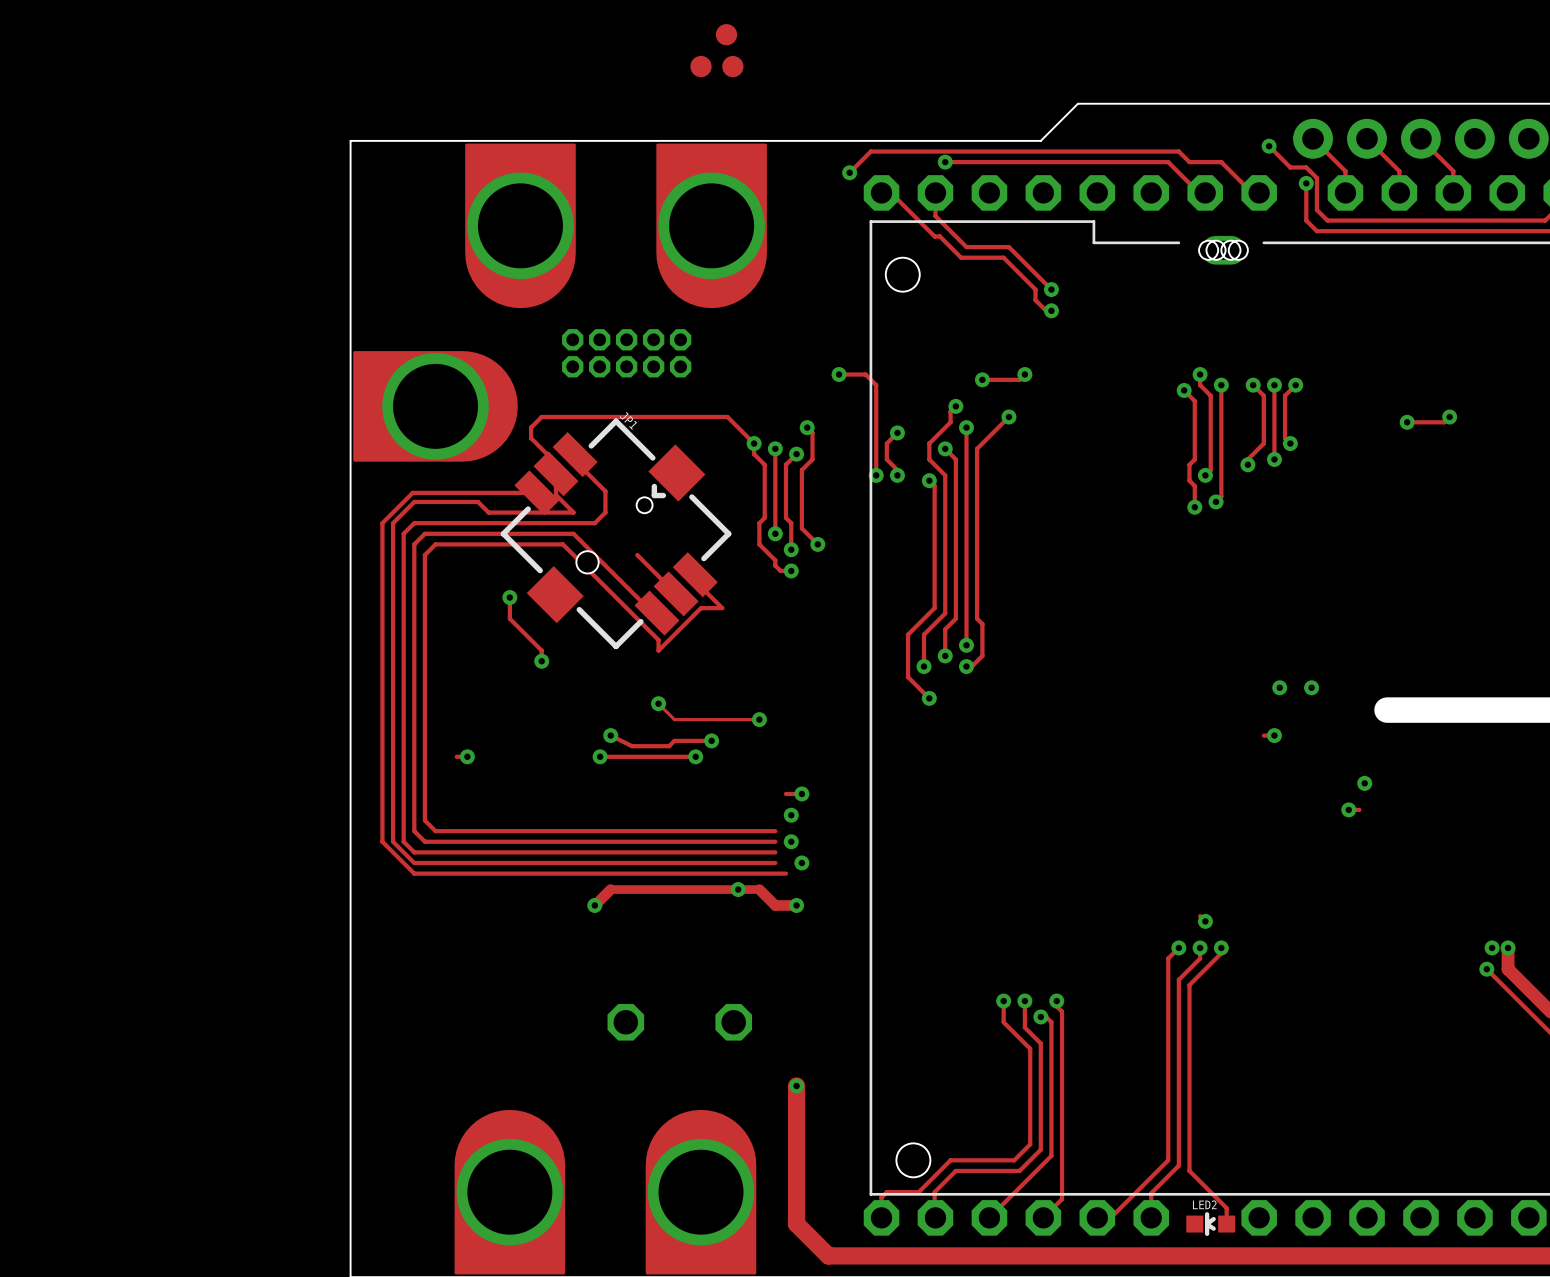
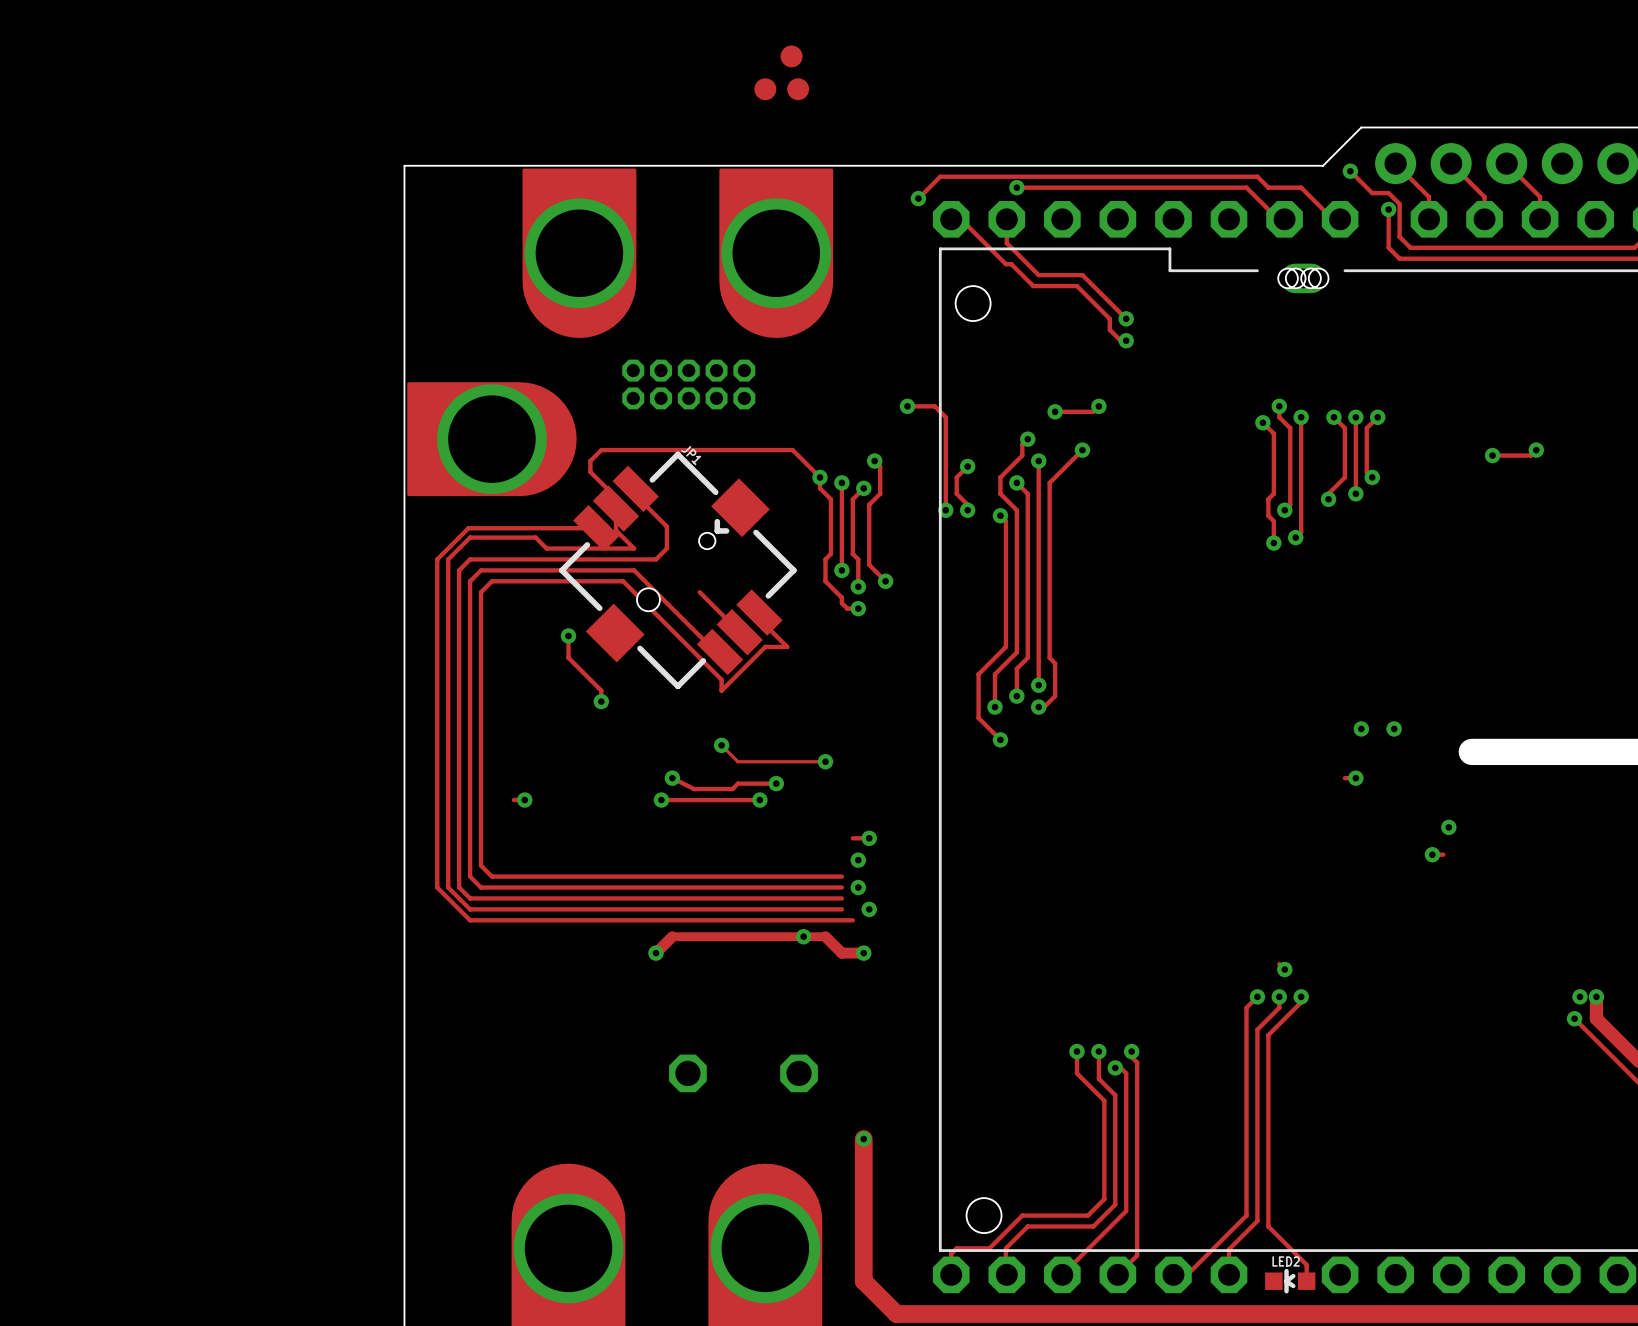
board edge: (1279, 103) (1077, 103) (1040, 140) -> (1361, 127) (1323, 165) (1115, 165)

